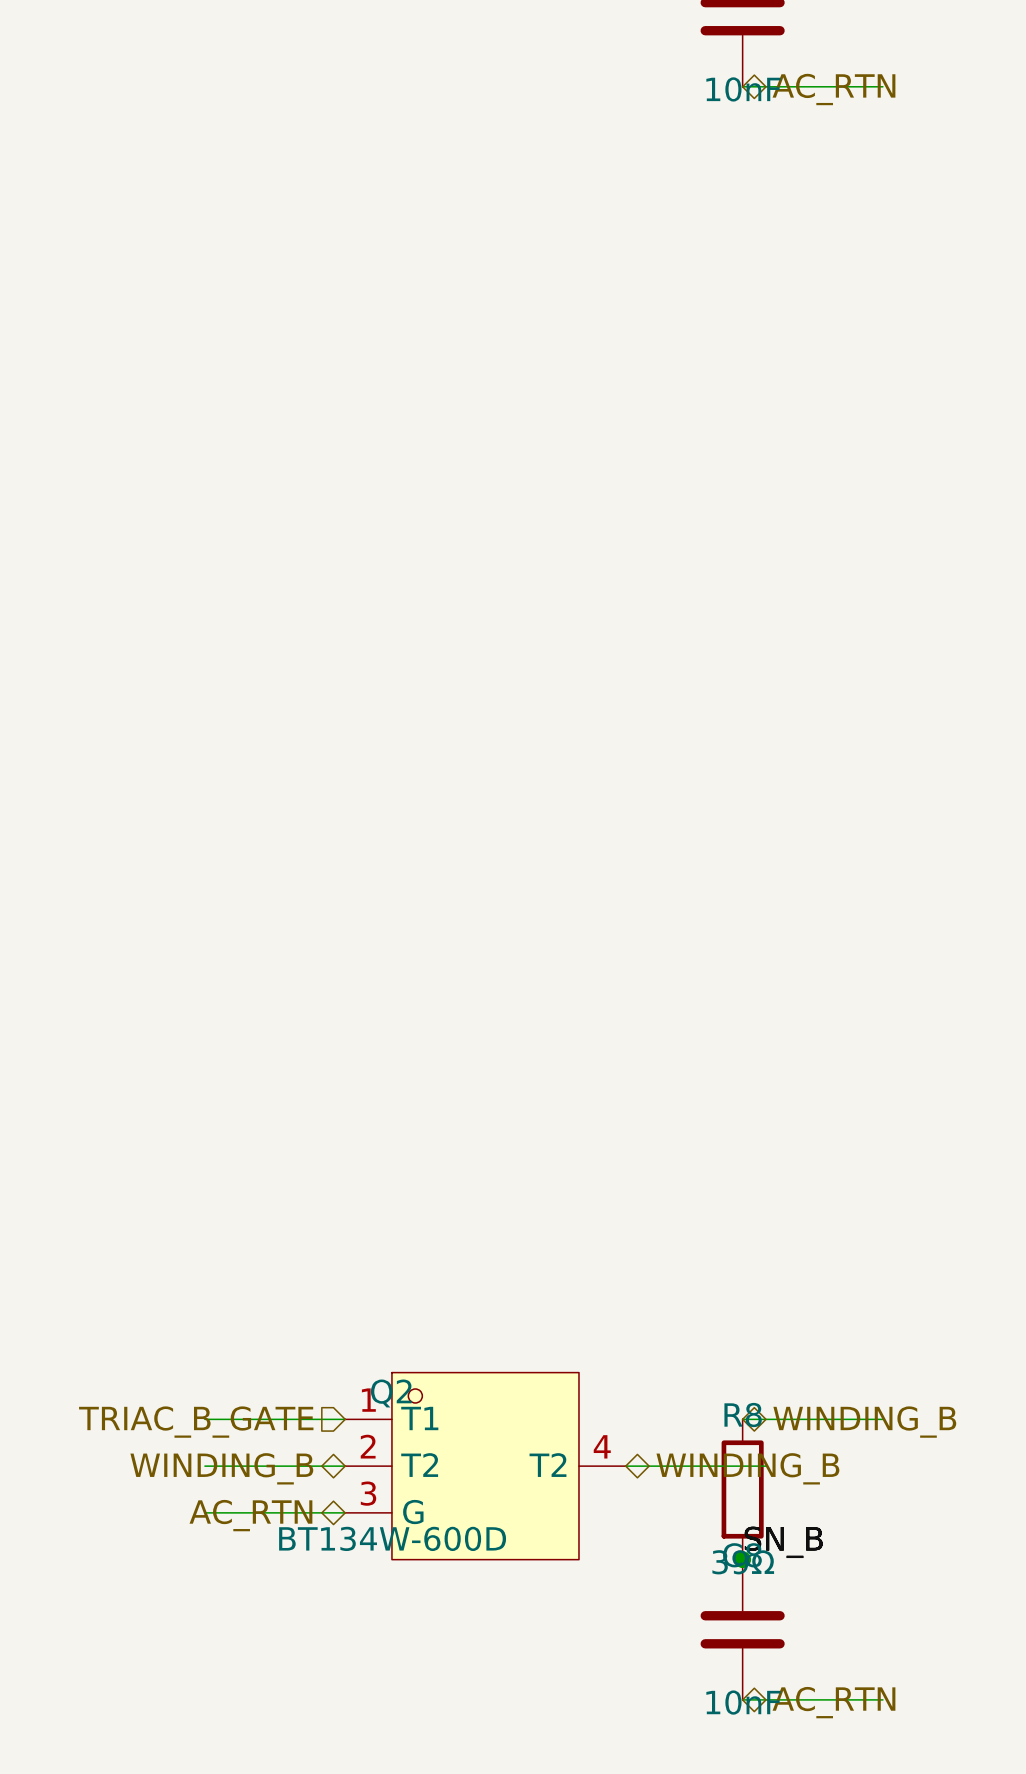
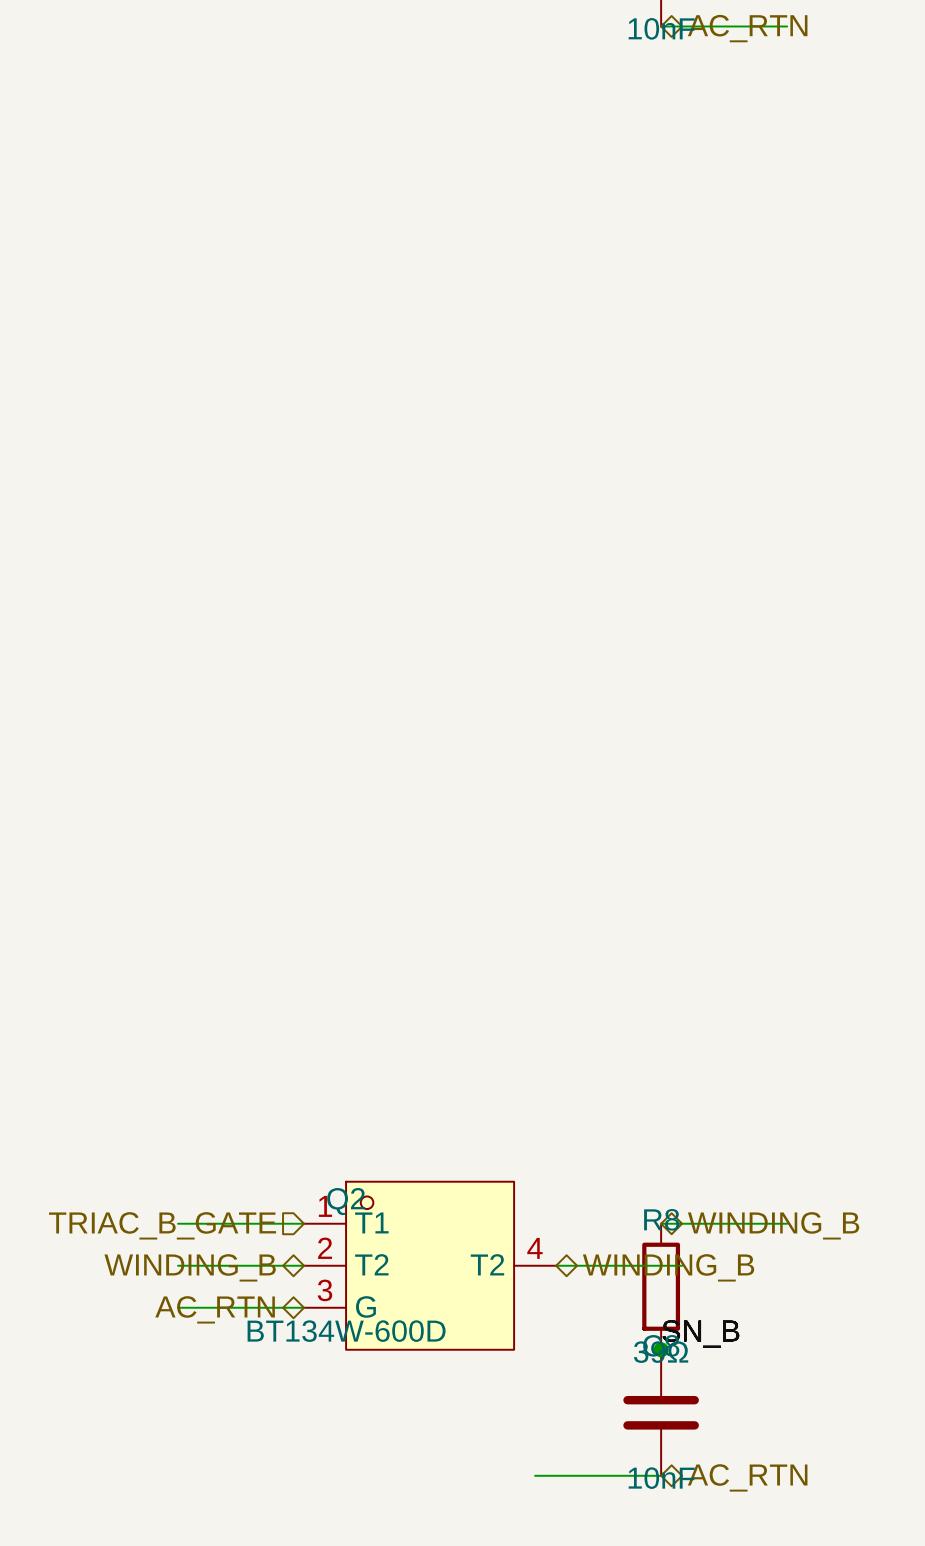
wire: (742, 1699) (882, 1699) -> (661, 1475) (535, 1475)

